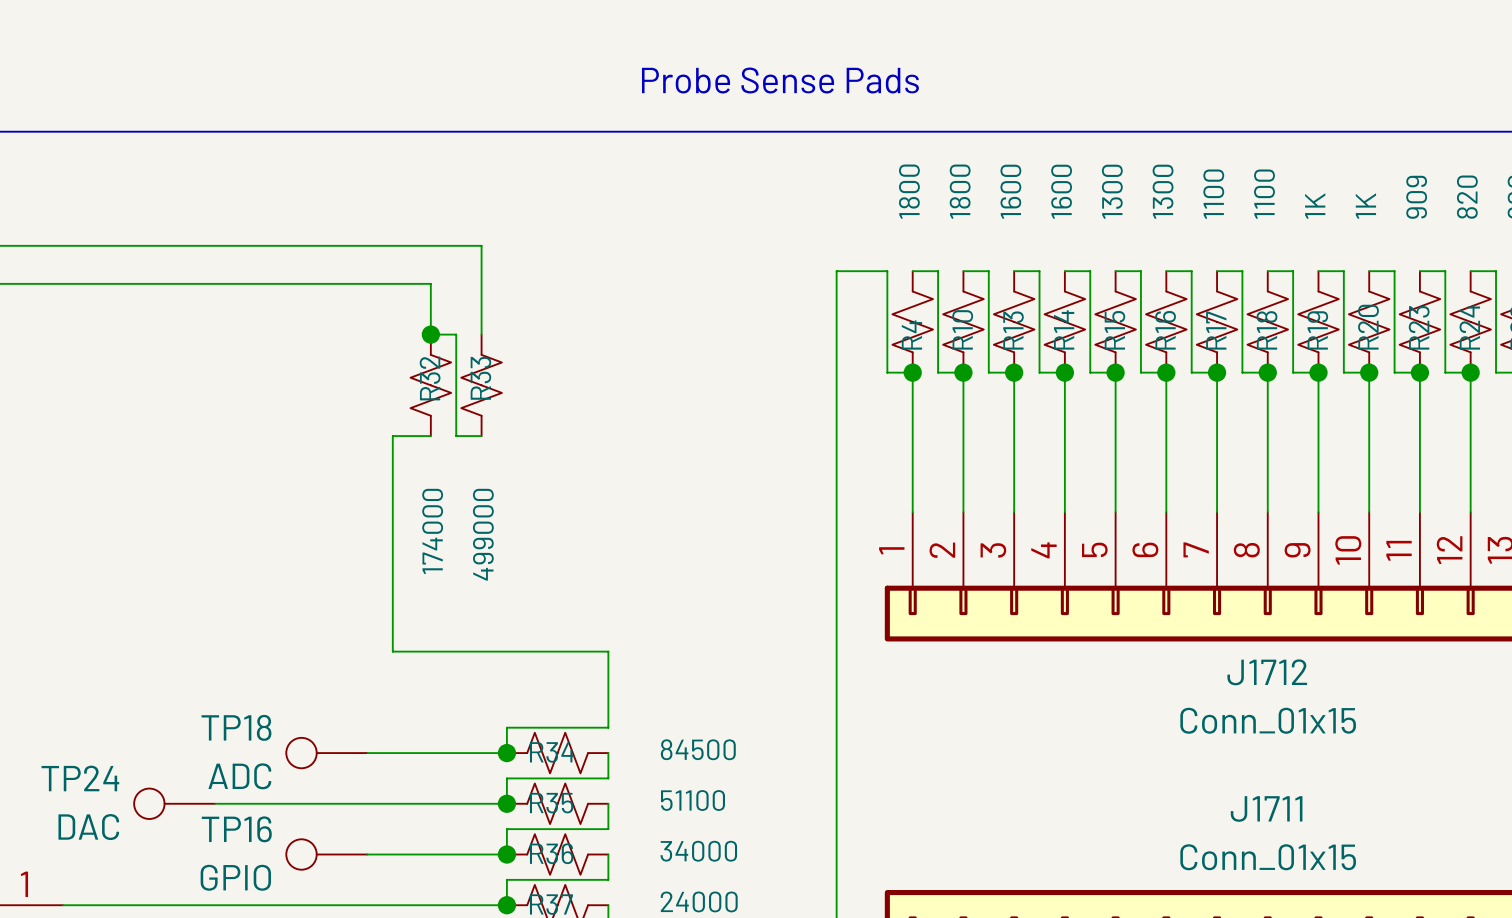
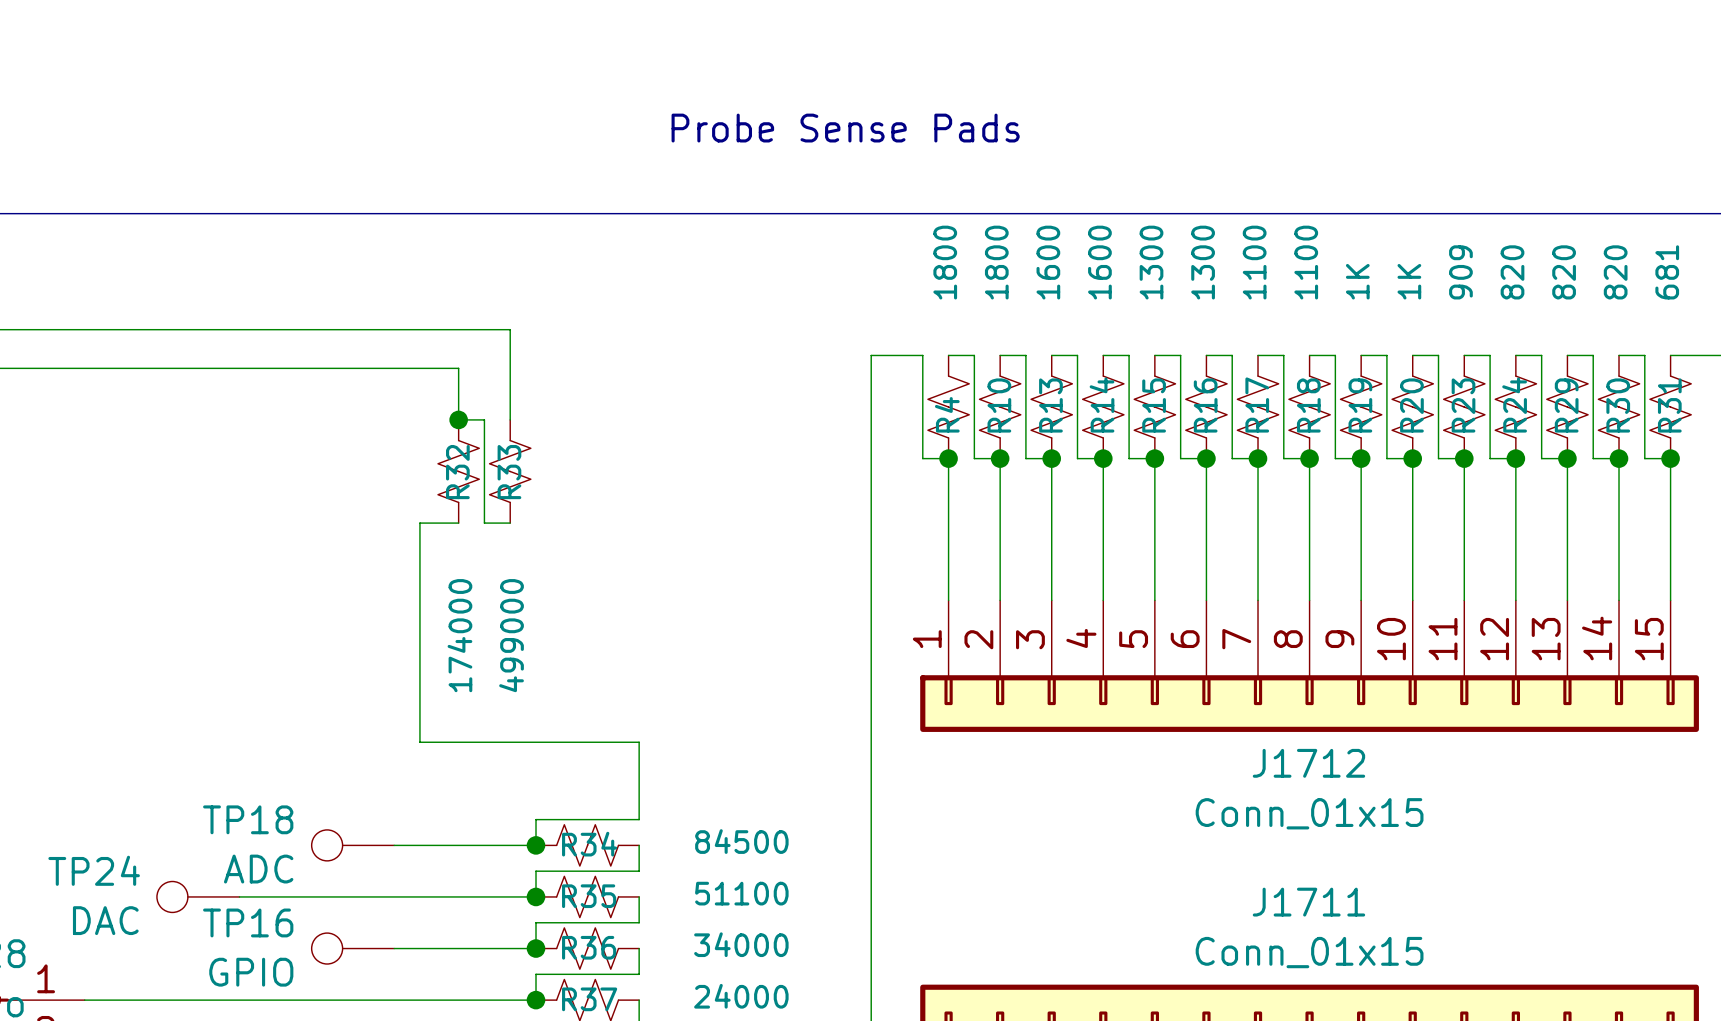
text position: Probe Sense Pads (780, 80) -> Probe Sense Pads (845, 128)

